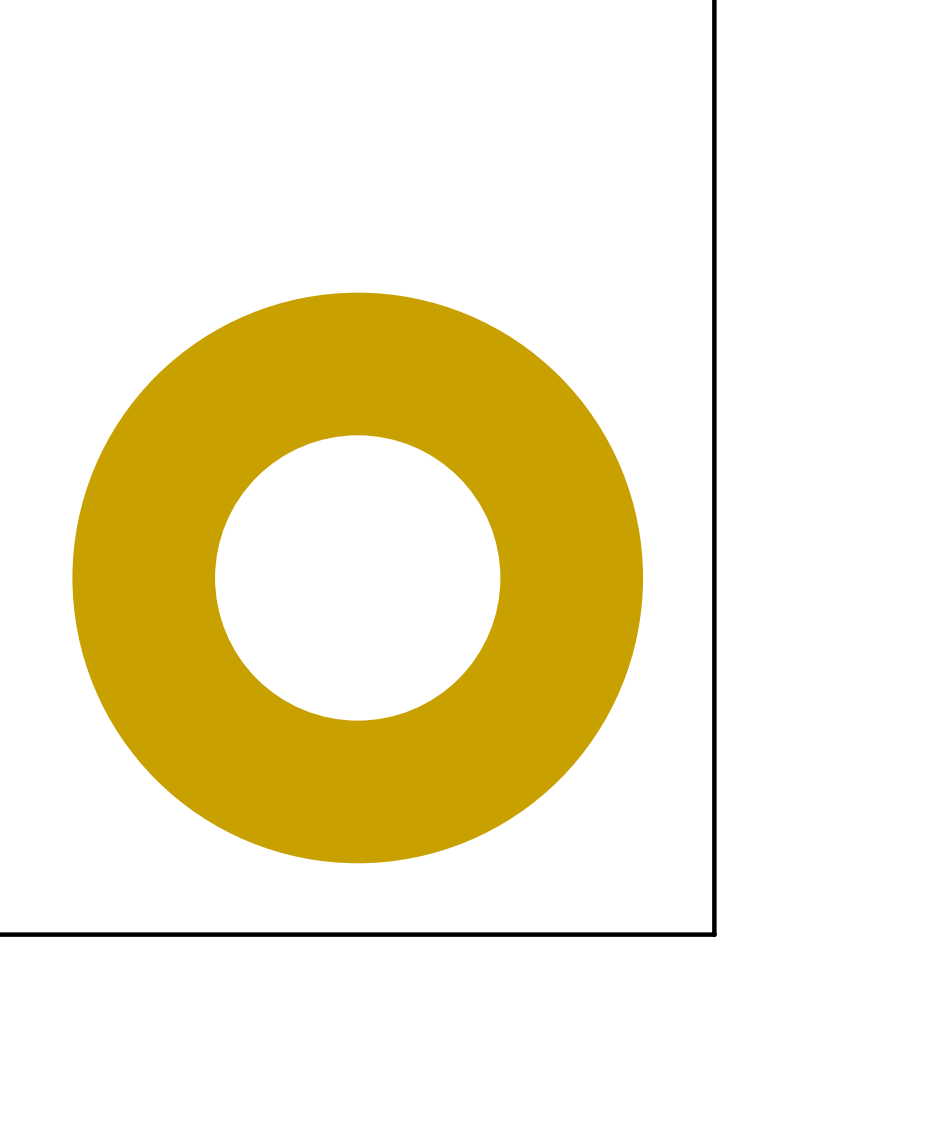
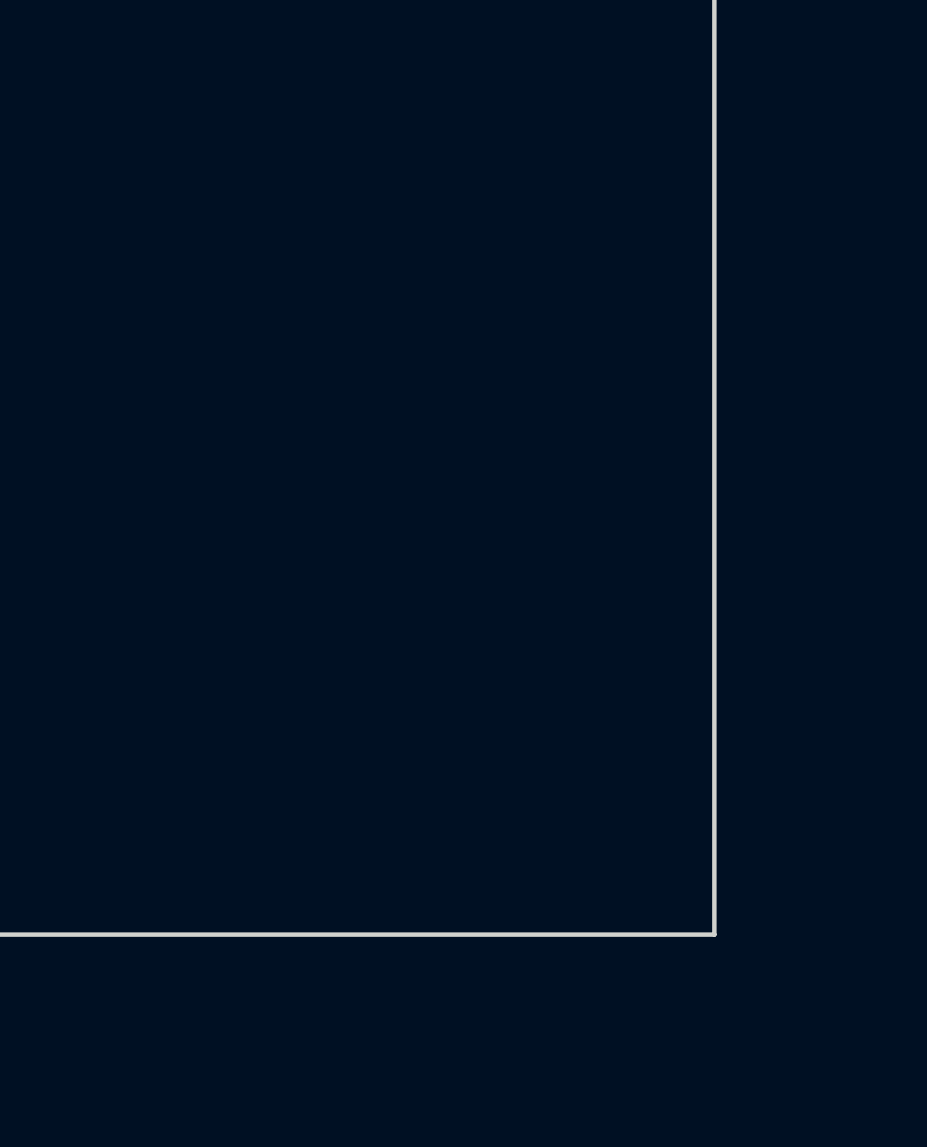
part: (357, 577) -> none

